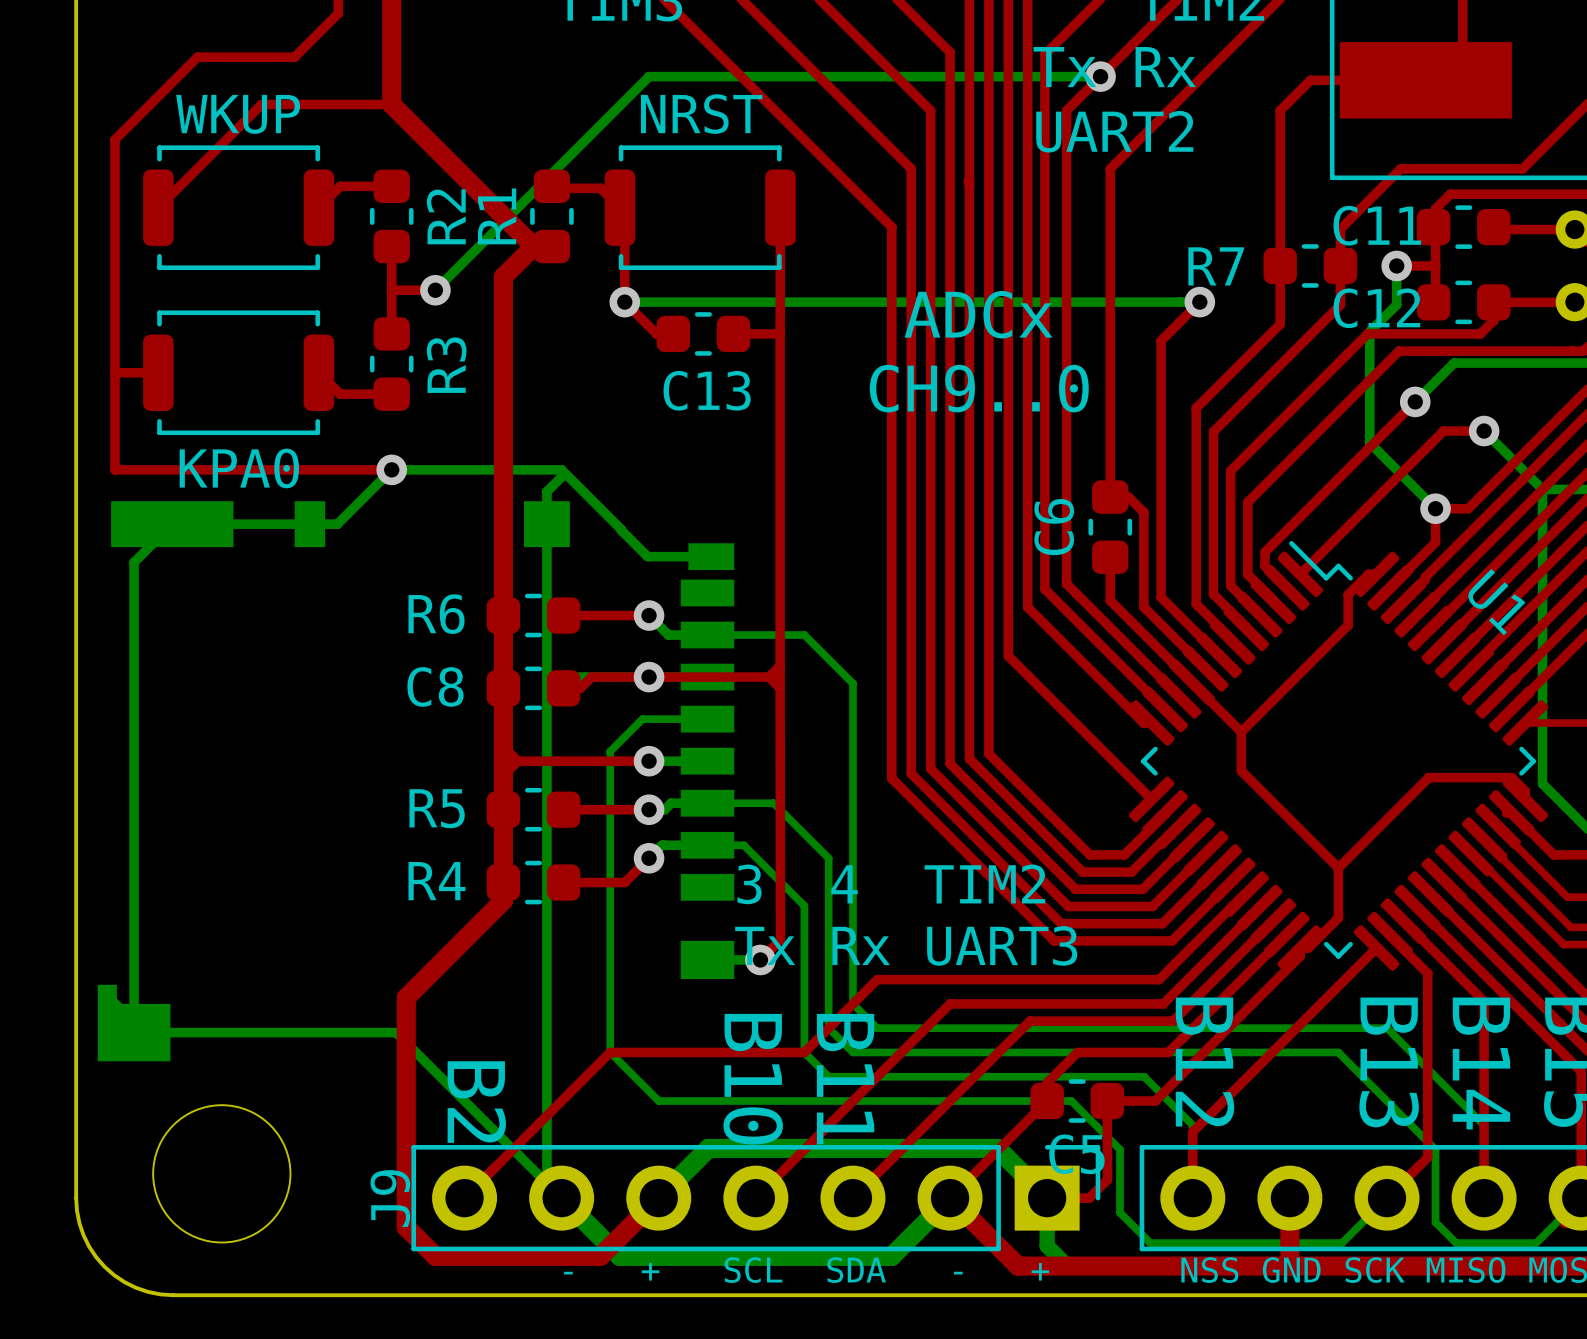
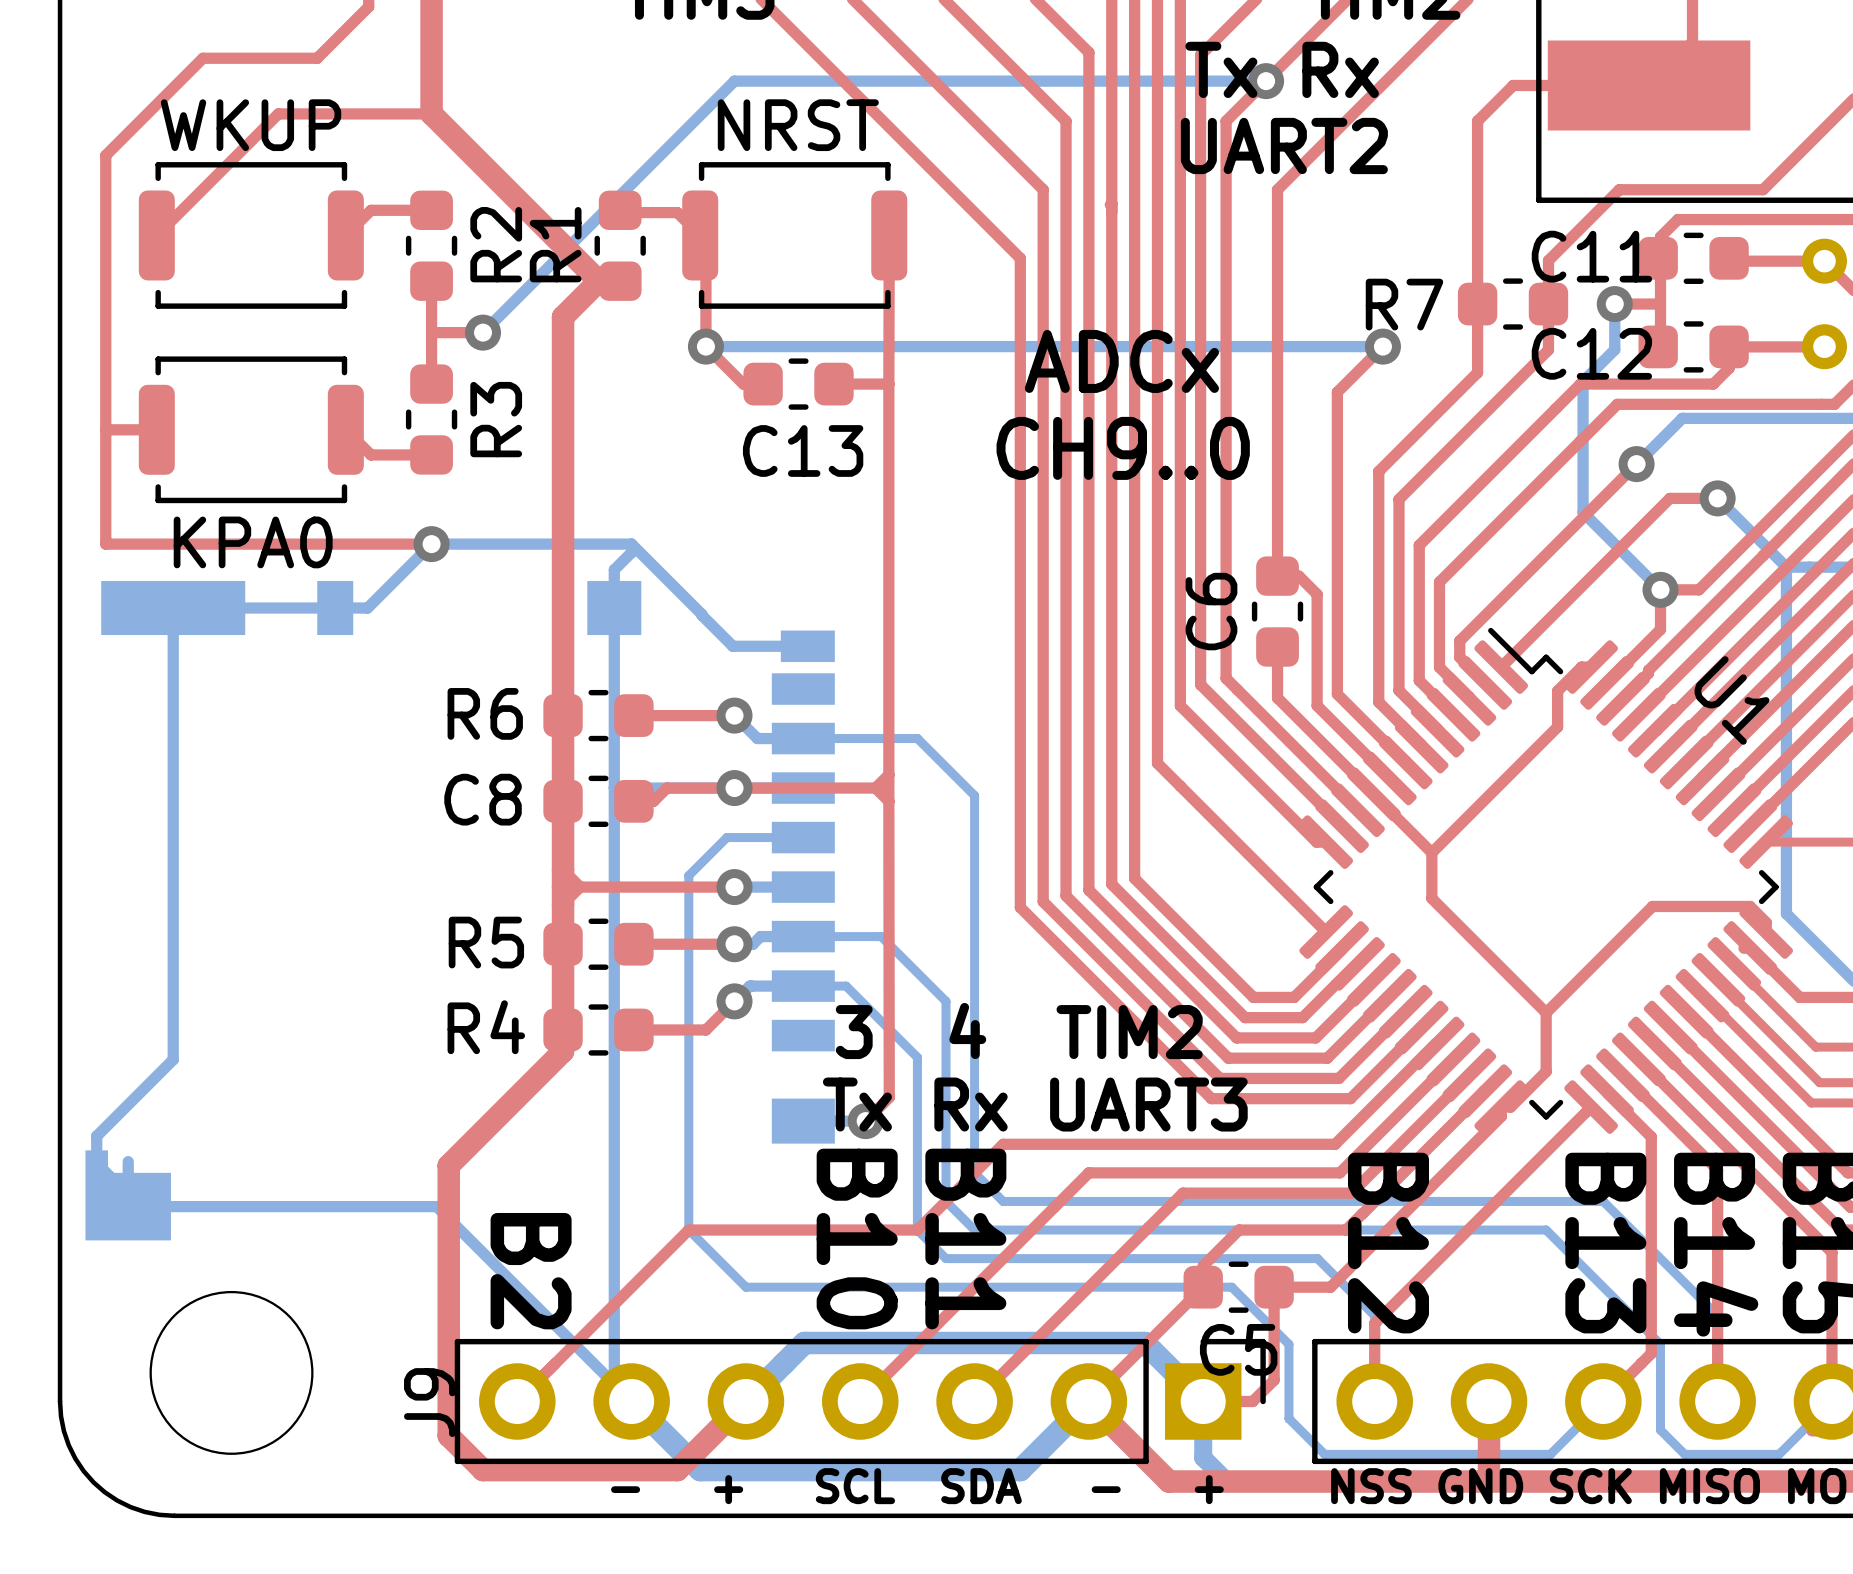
bottom track: (172, 524) (134, 562) (134, 994) -> (173, 608) (173, 1059) (96, 1136) (96, 1161)

